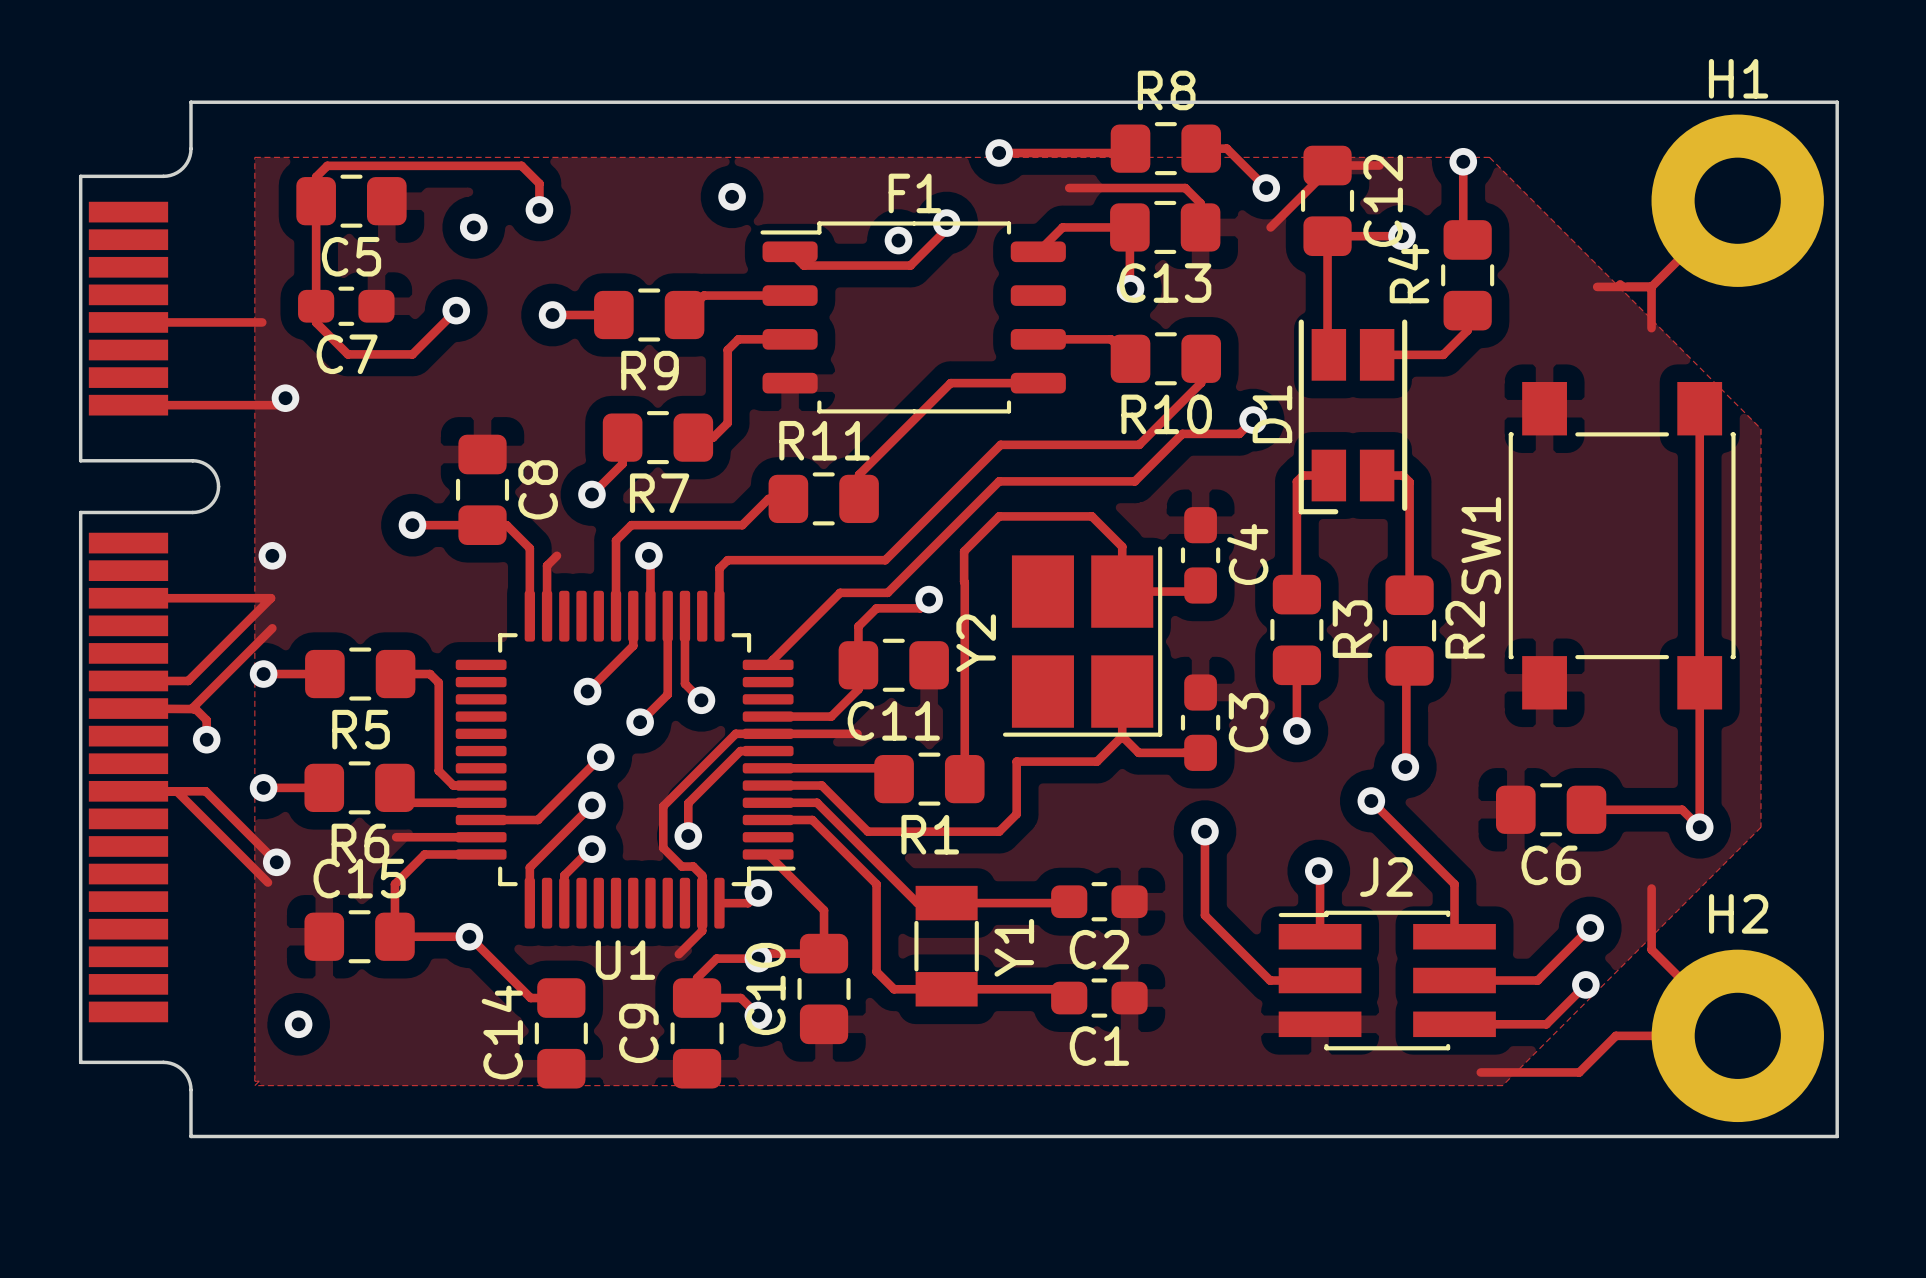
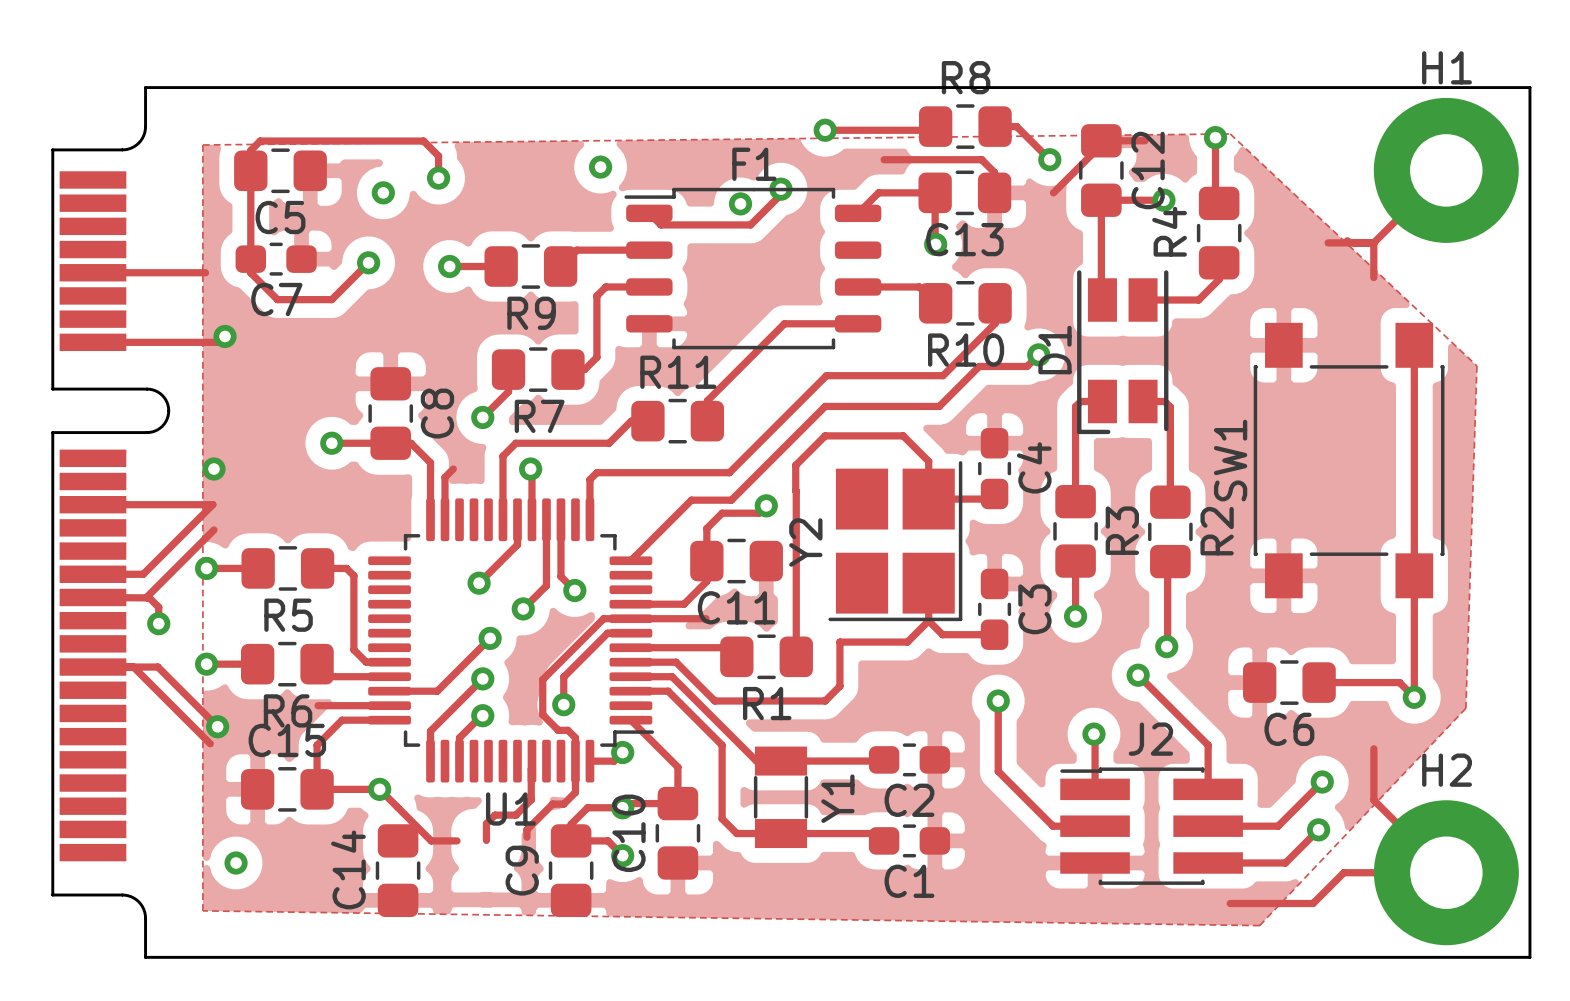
zone outline: (254, 157) (254, 1081) (259, 1081) (254, 1085) (1502, 1085) (1761, 827) (1761, 428) (1489, 157) (254, 157) -> (1230, 133) (202, 144) (202, 910) (1259, 925) (1465, 708) (1476, 365) (1230, 133)
track: none -> (531, 761) (531, 799) (515, 815) (495, 815) (486, 823) (486, 840)
track: (702, 930) (678, 954) -> (575, 784) (575, 792) (563, 804) (552, 804) (526, 829) (526, 837)
C14 position: (561, 1033) -> (398, 870)

